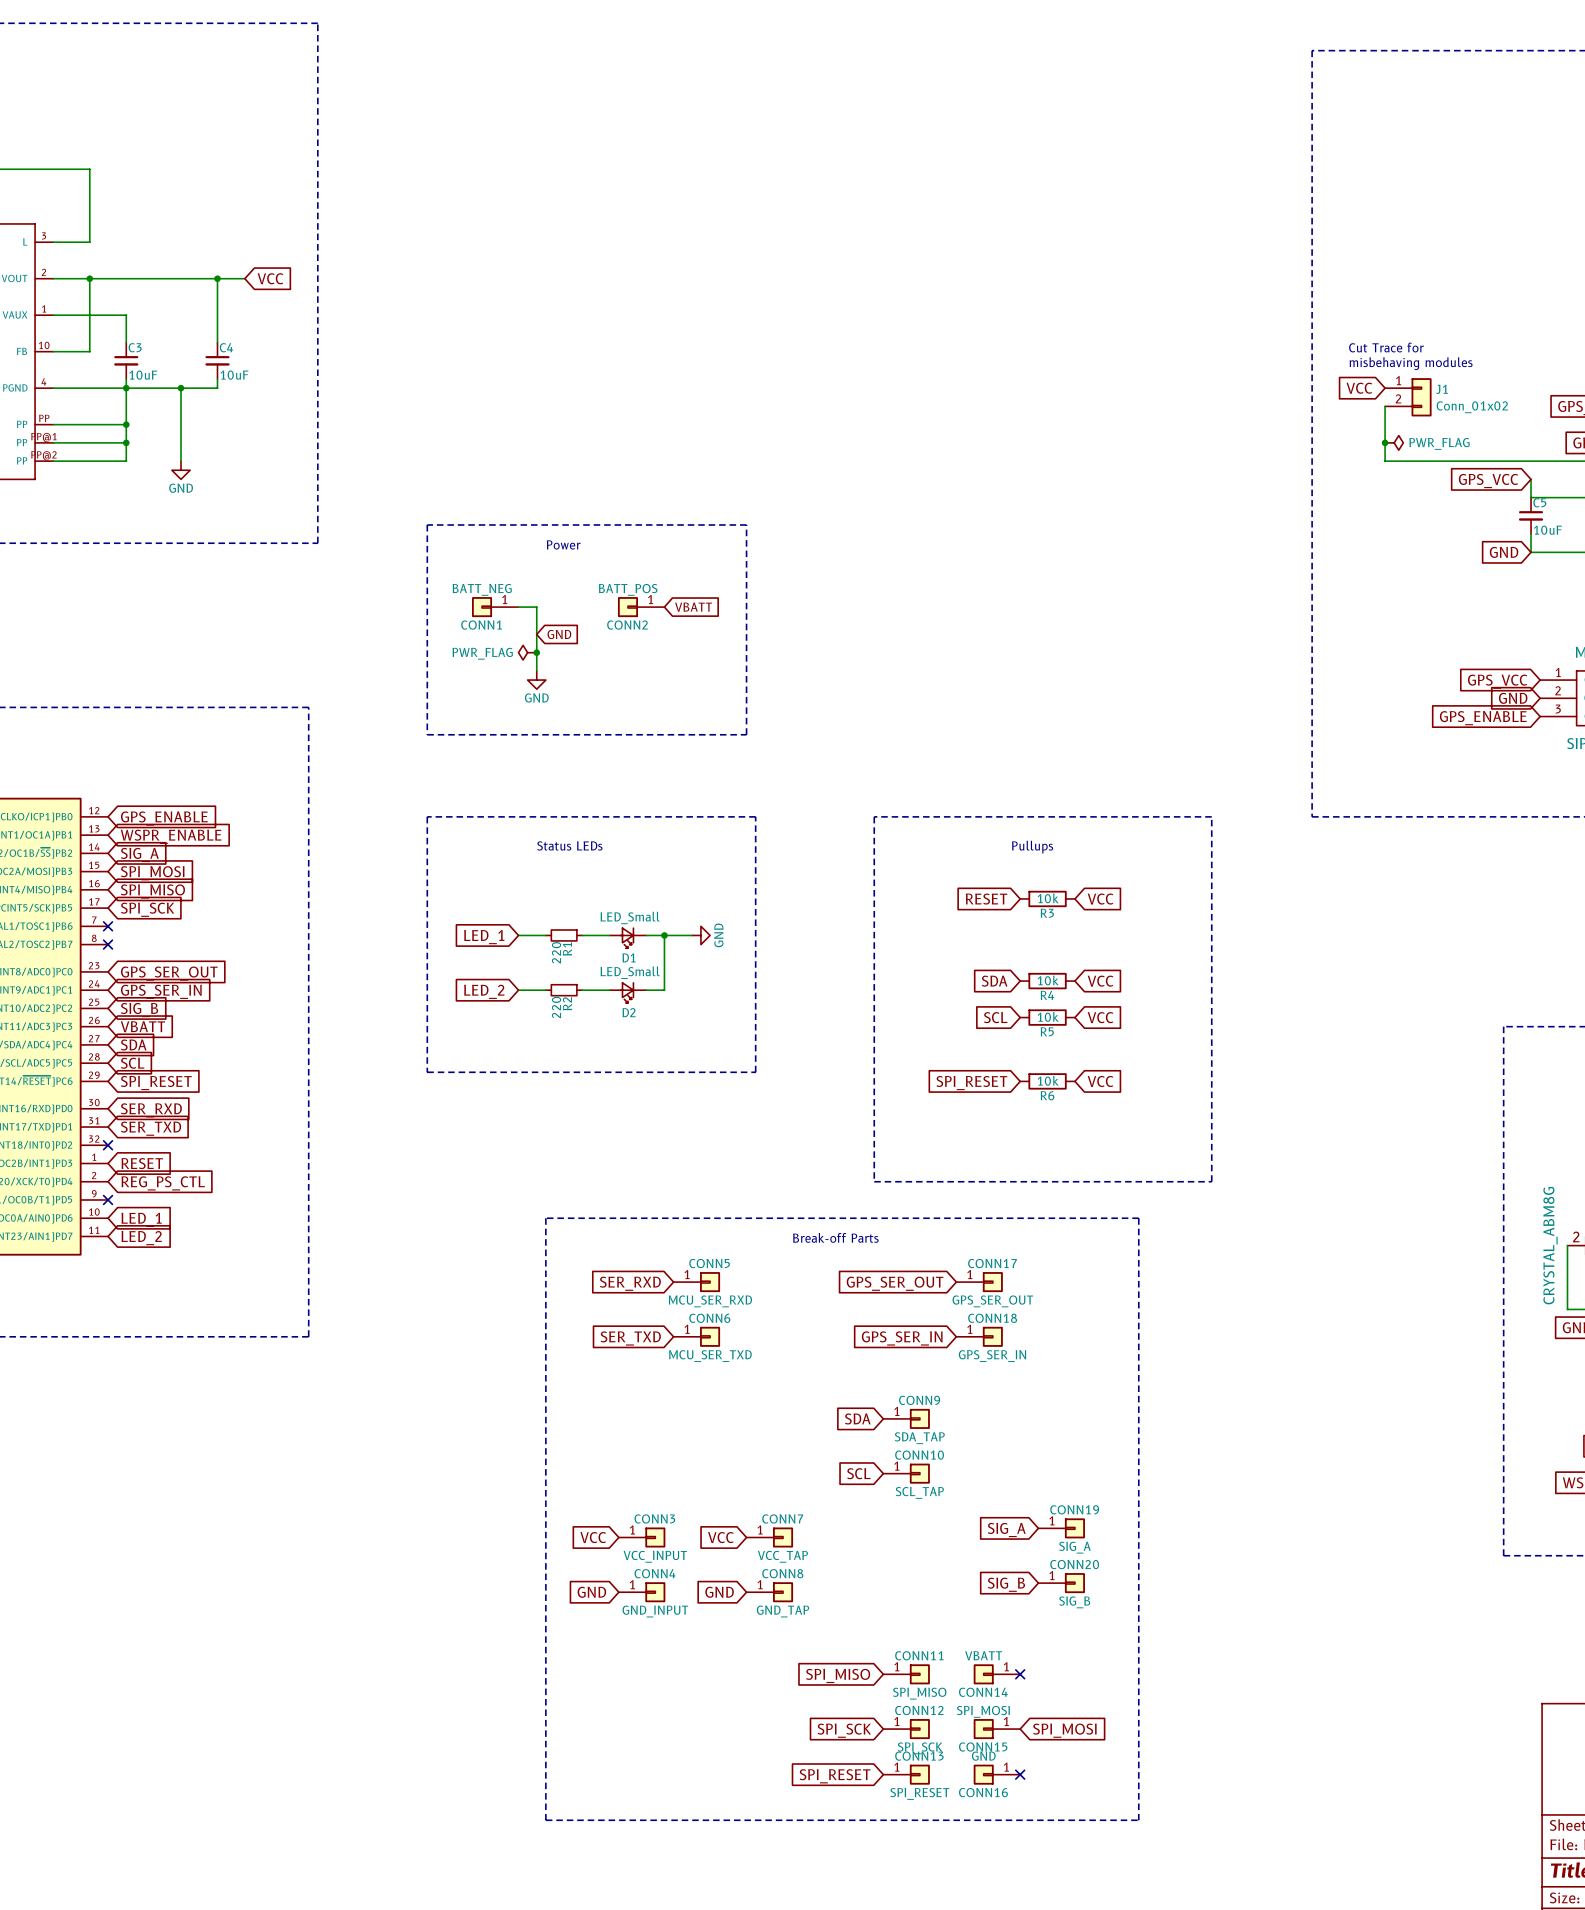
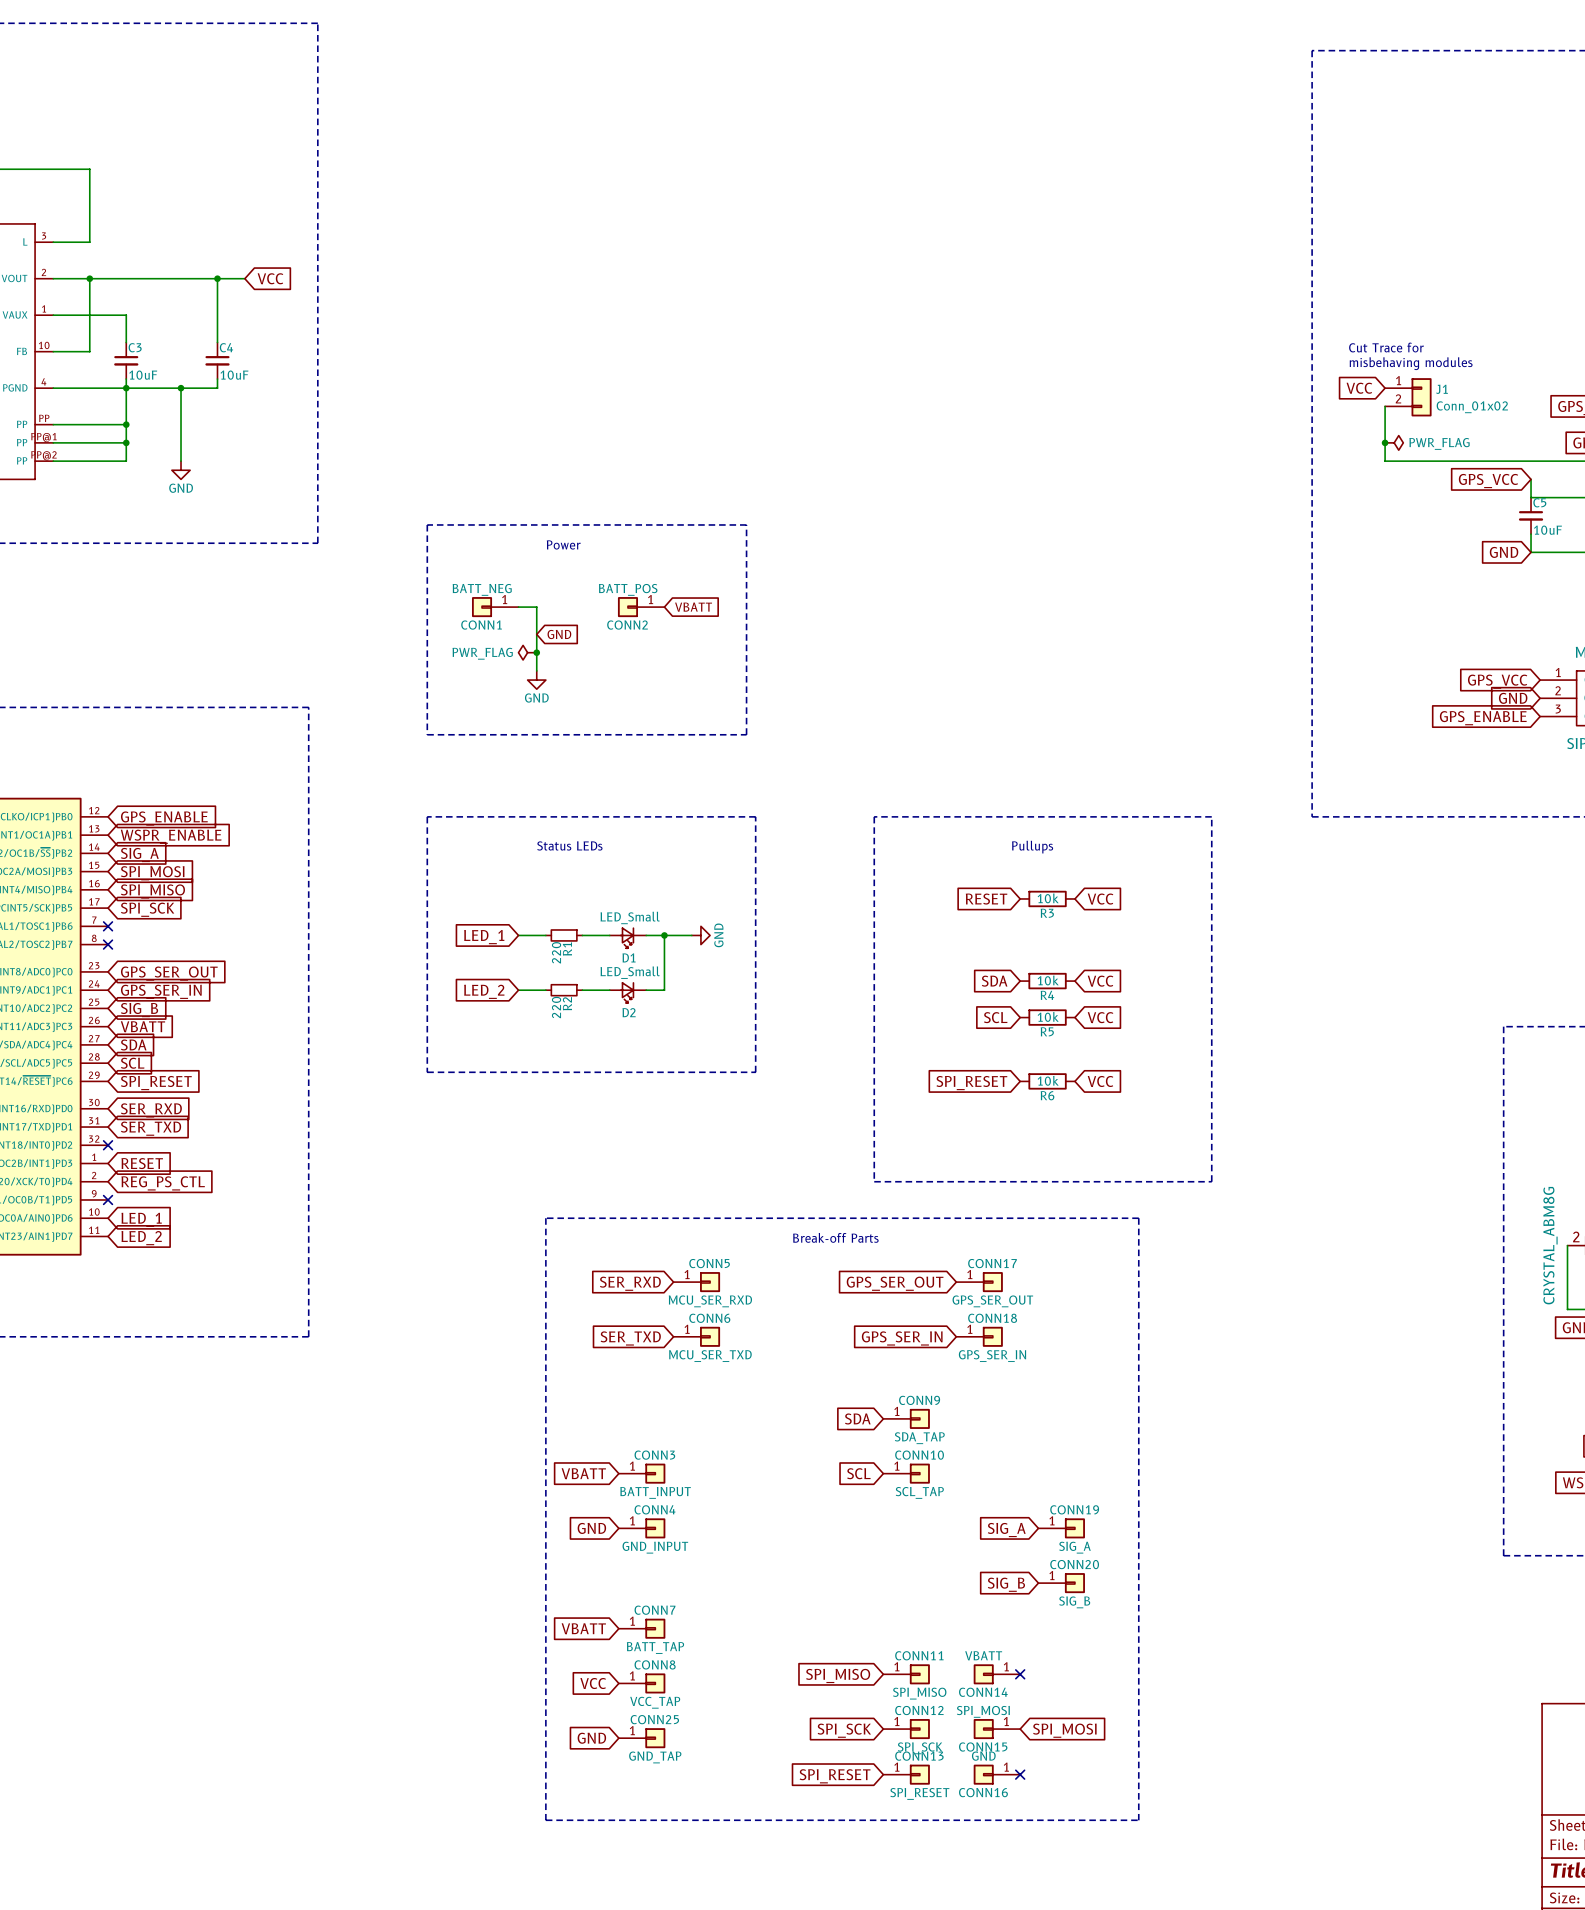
global label: none -> VBATT (583, 1473)
global label: VCC (593, 1537) -> none
CONN3 position: (642, 1537) -> (642, 1473)
global label: VCC (720, 1537) -> none
CONN7 position: (769, 1537) -> (642, 1628)
CONN3 value: VCC_INPUT (655, 1556) -> BATT_INPUT (655, 1492)
CONN7 value: VCC_TAP (782, 1556) -> BATT_TAP (655, 1647)
global label position: GND (591, 1592) -> GND (591, 1528)
CONN4 position: (642, 1592) -> (642, 1528)
global label: GND (719, 1592) -> none
CONN8 position: (769, 1592) -> (642, 1683)
CONN8 value: GND_TAP (782, 1611) -> VCC_TAP (655, 1702)
global label: none -> VBATT (583, 1628)
global label: none -> VCC (593, 1683)
global label: none -> GND (591, 1738)
CONN25: none -> GND_TAP (642, 1738)

